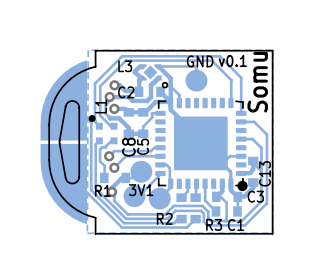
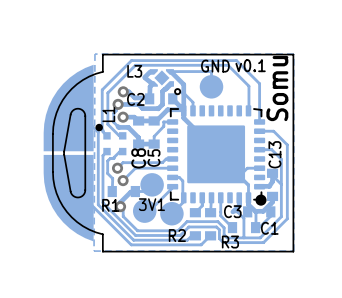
C13 name position: C13 (264, 173) -> C13 (274, 154)
C3 position: (227, 196) -> (259, 211)
track: none -> (270, 211) (270, 216) (259, 227)
C3 name position: C3 (255, 196) -> C3 (232, 211)
C1 name position: C1 (236, 225) -> C1 (269, 228)

